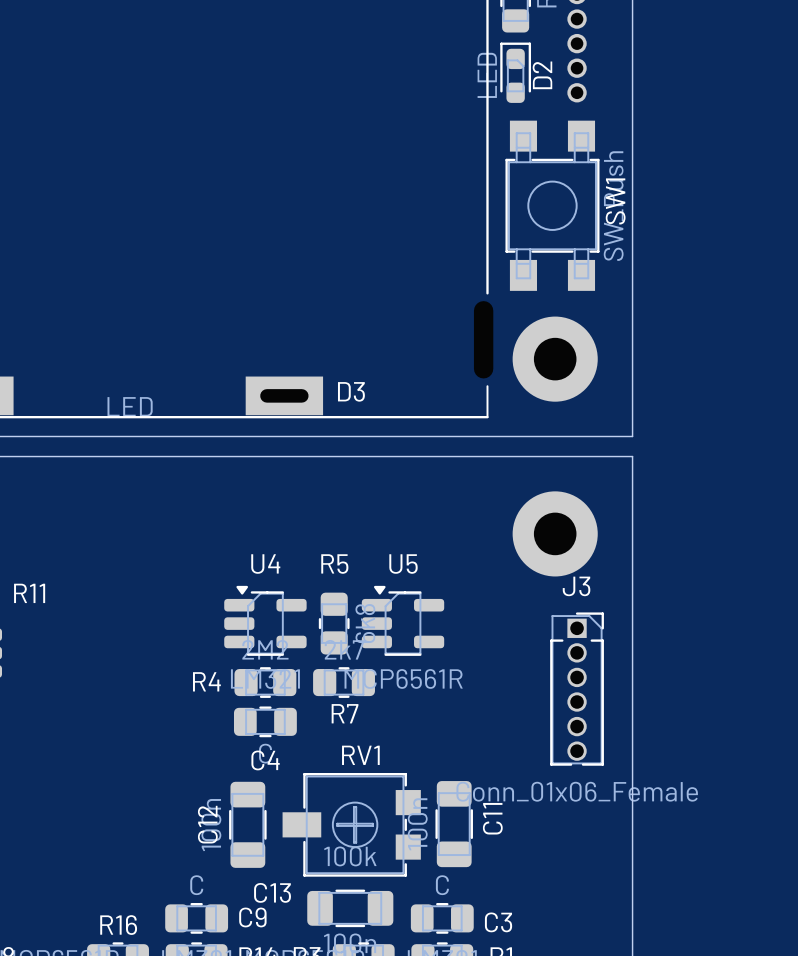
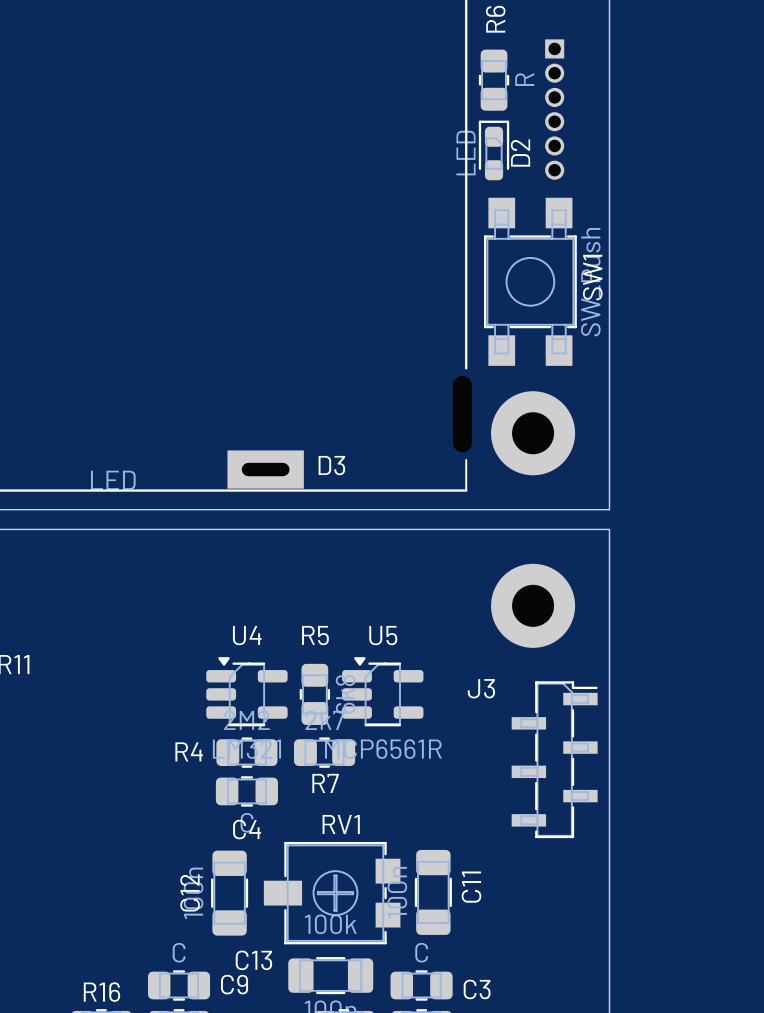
J3 name position: J3 (576, 586) -> J3 (481, 688)
J3 footprint: [550, 612, 604, 766] -> [511, 681, 598, 839]
J3 value: Conn_01x06_Female (577, 791) -> none

